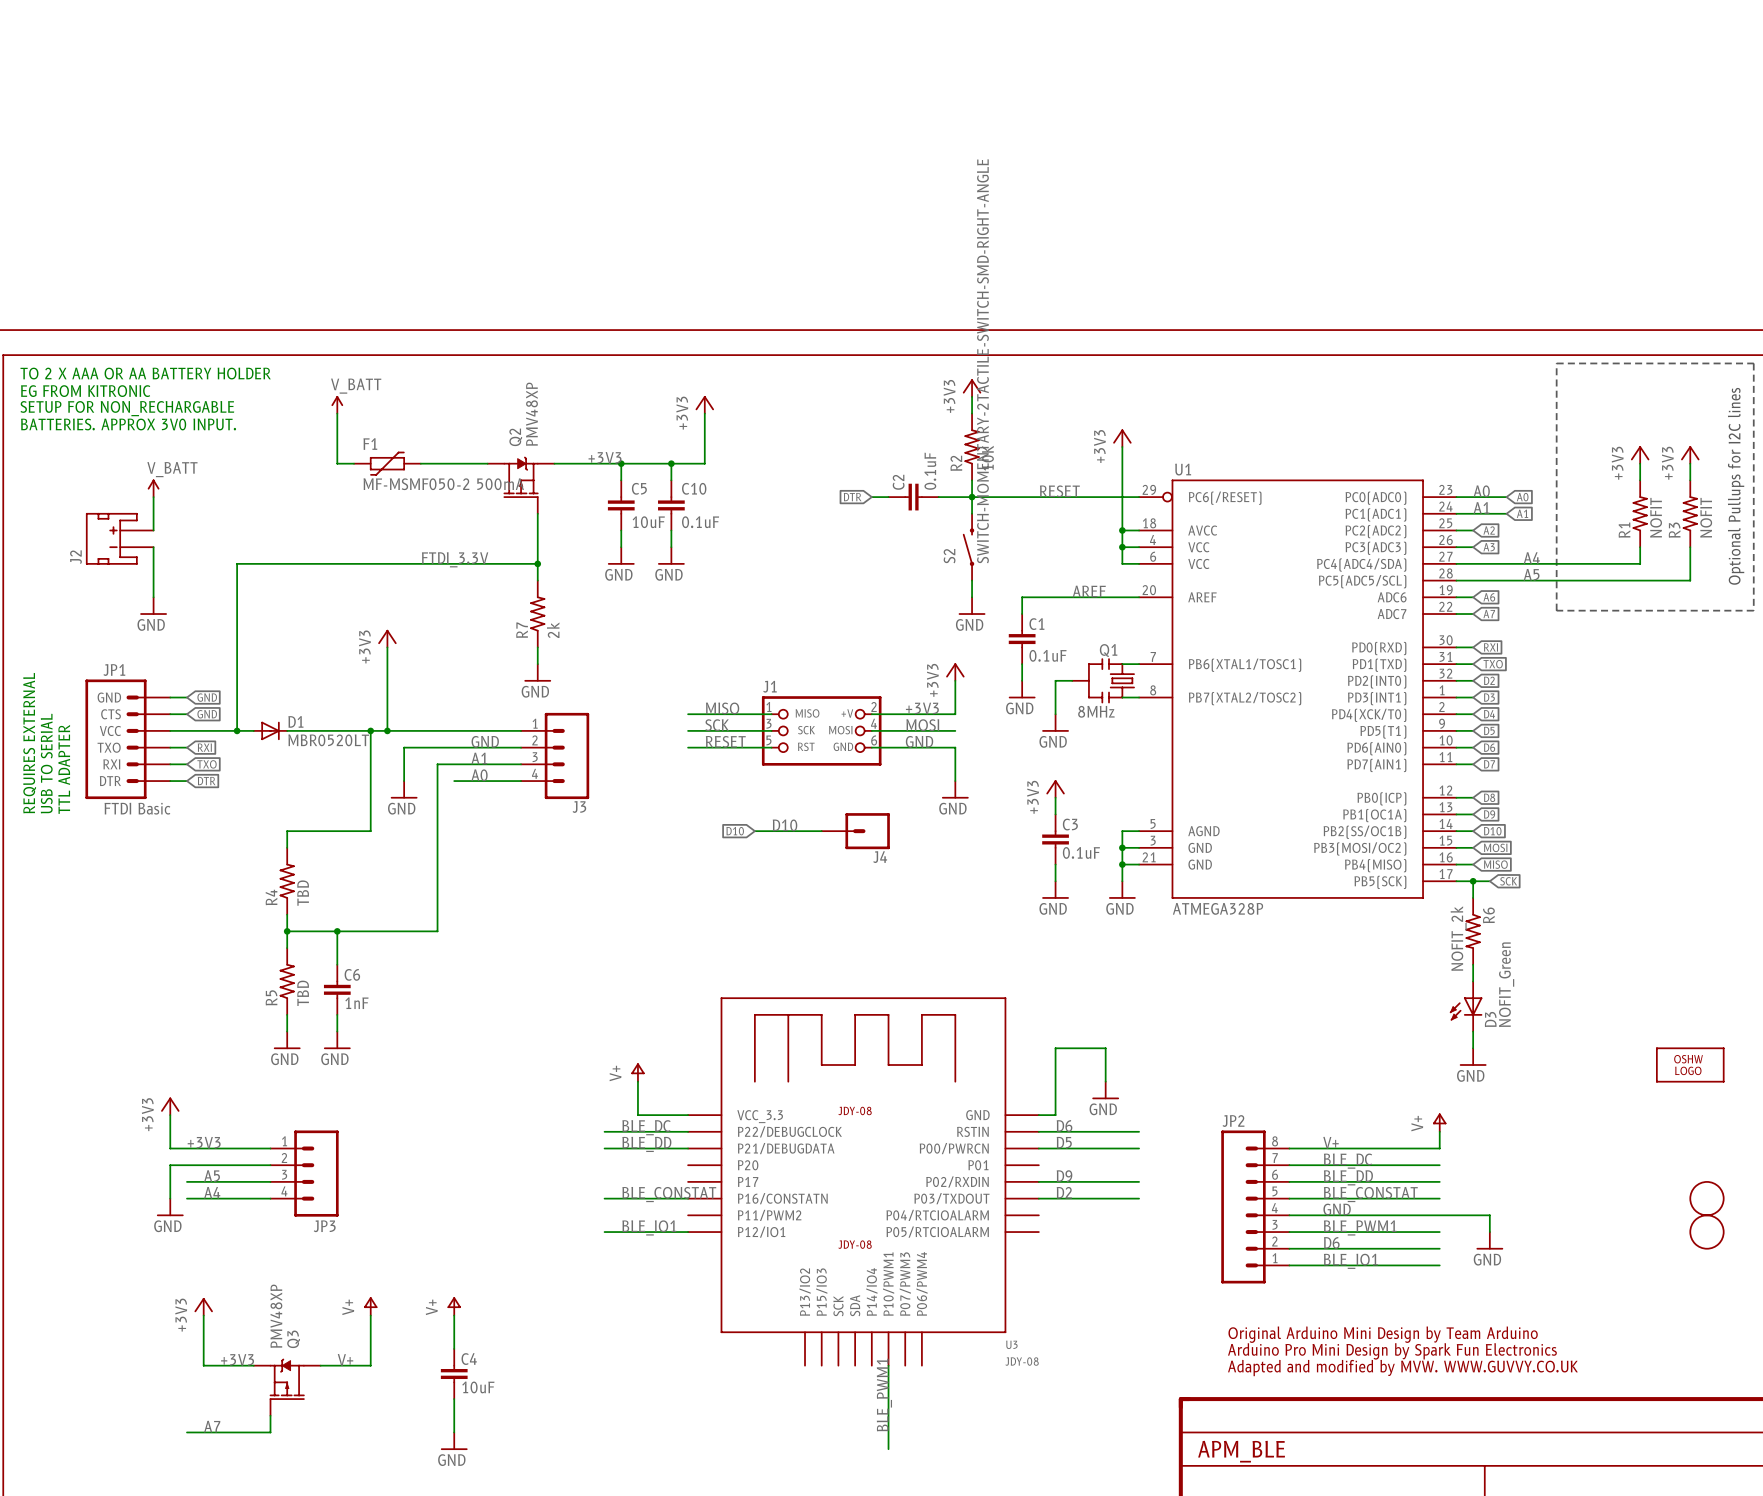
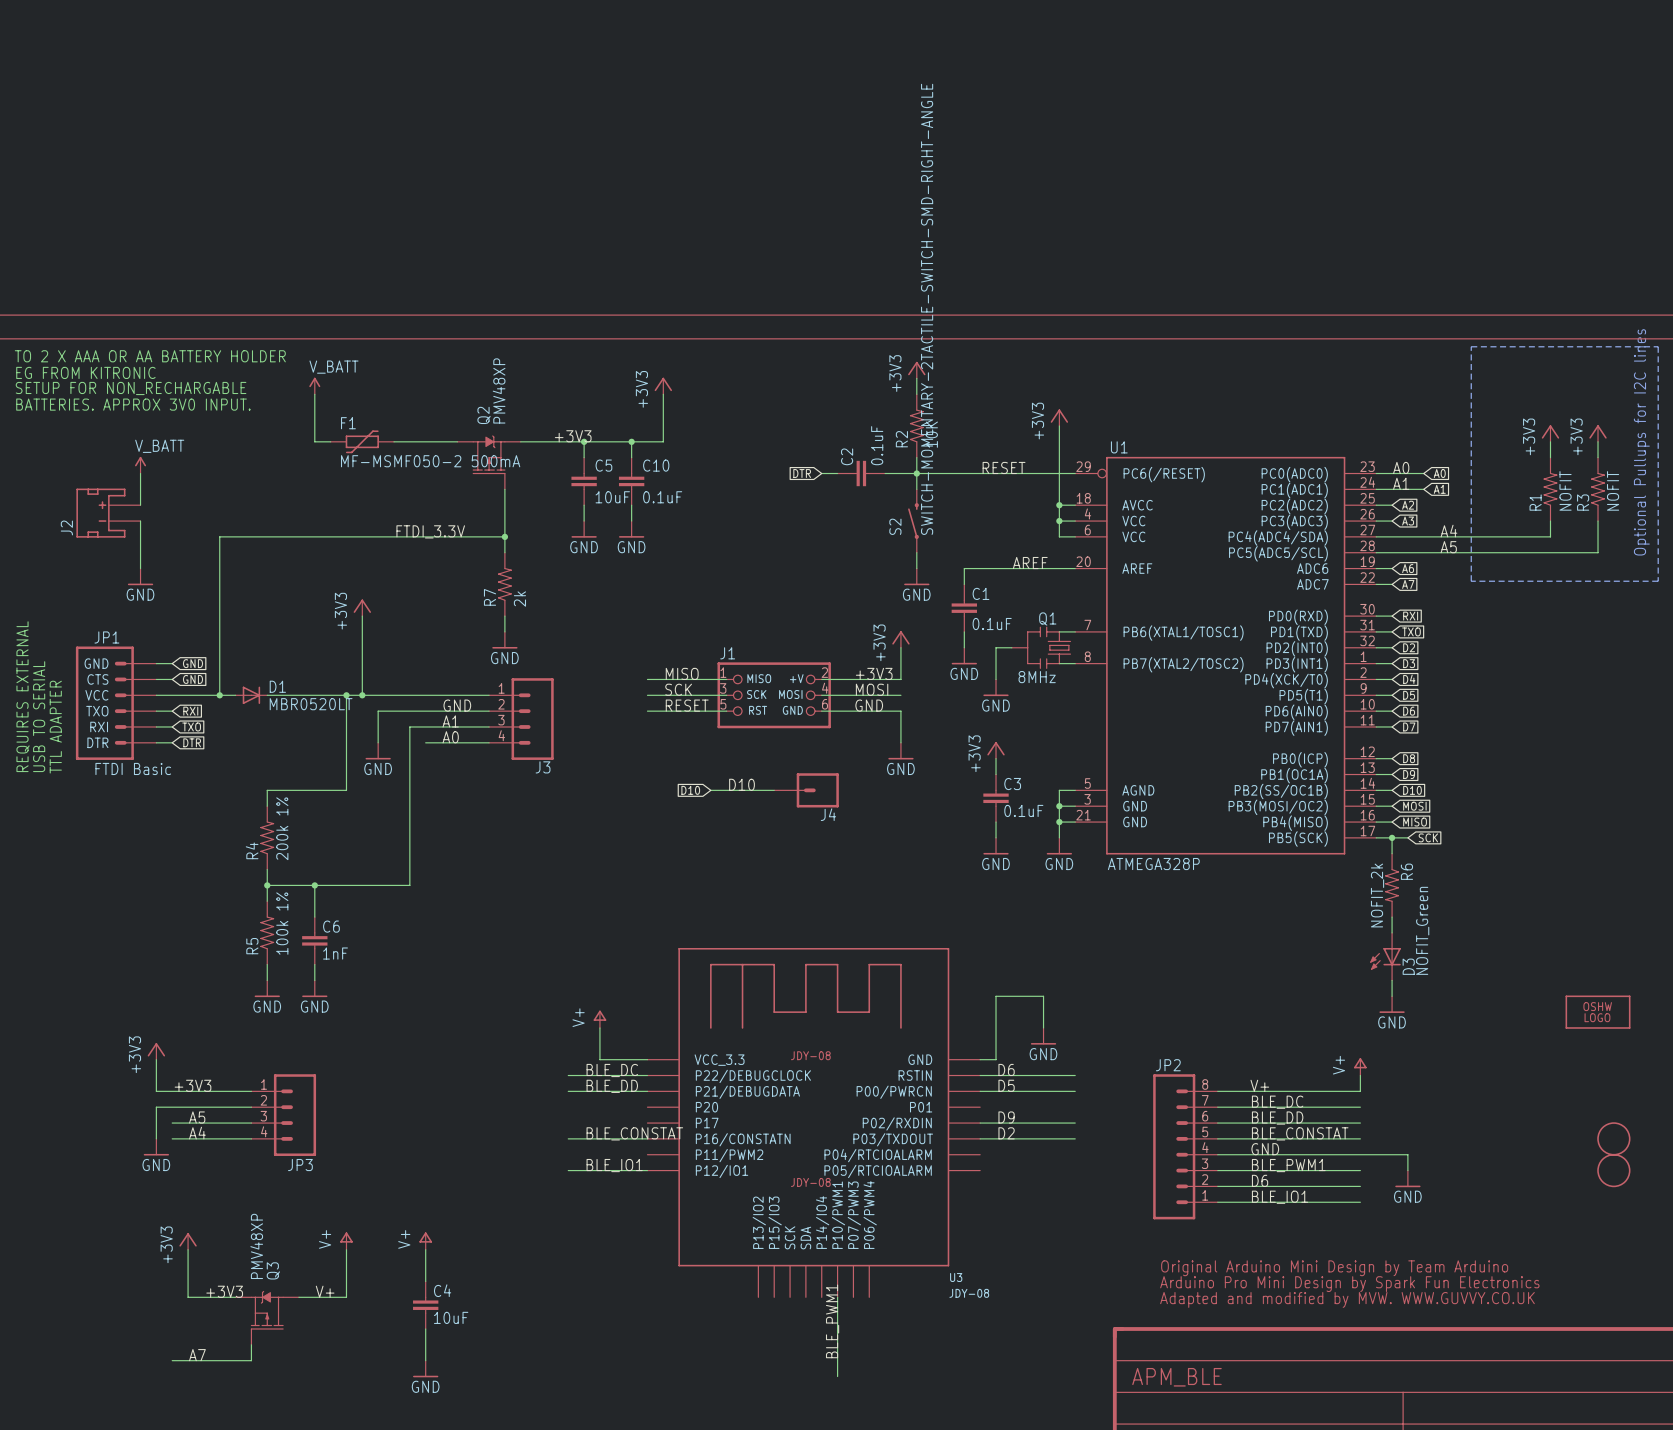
R4 value: TBD (303, 893) -> 200k 1% (282, 828)
R5 value: TBD (303, 993) -> 100k 1% (282, 923)

